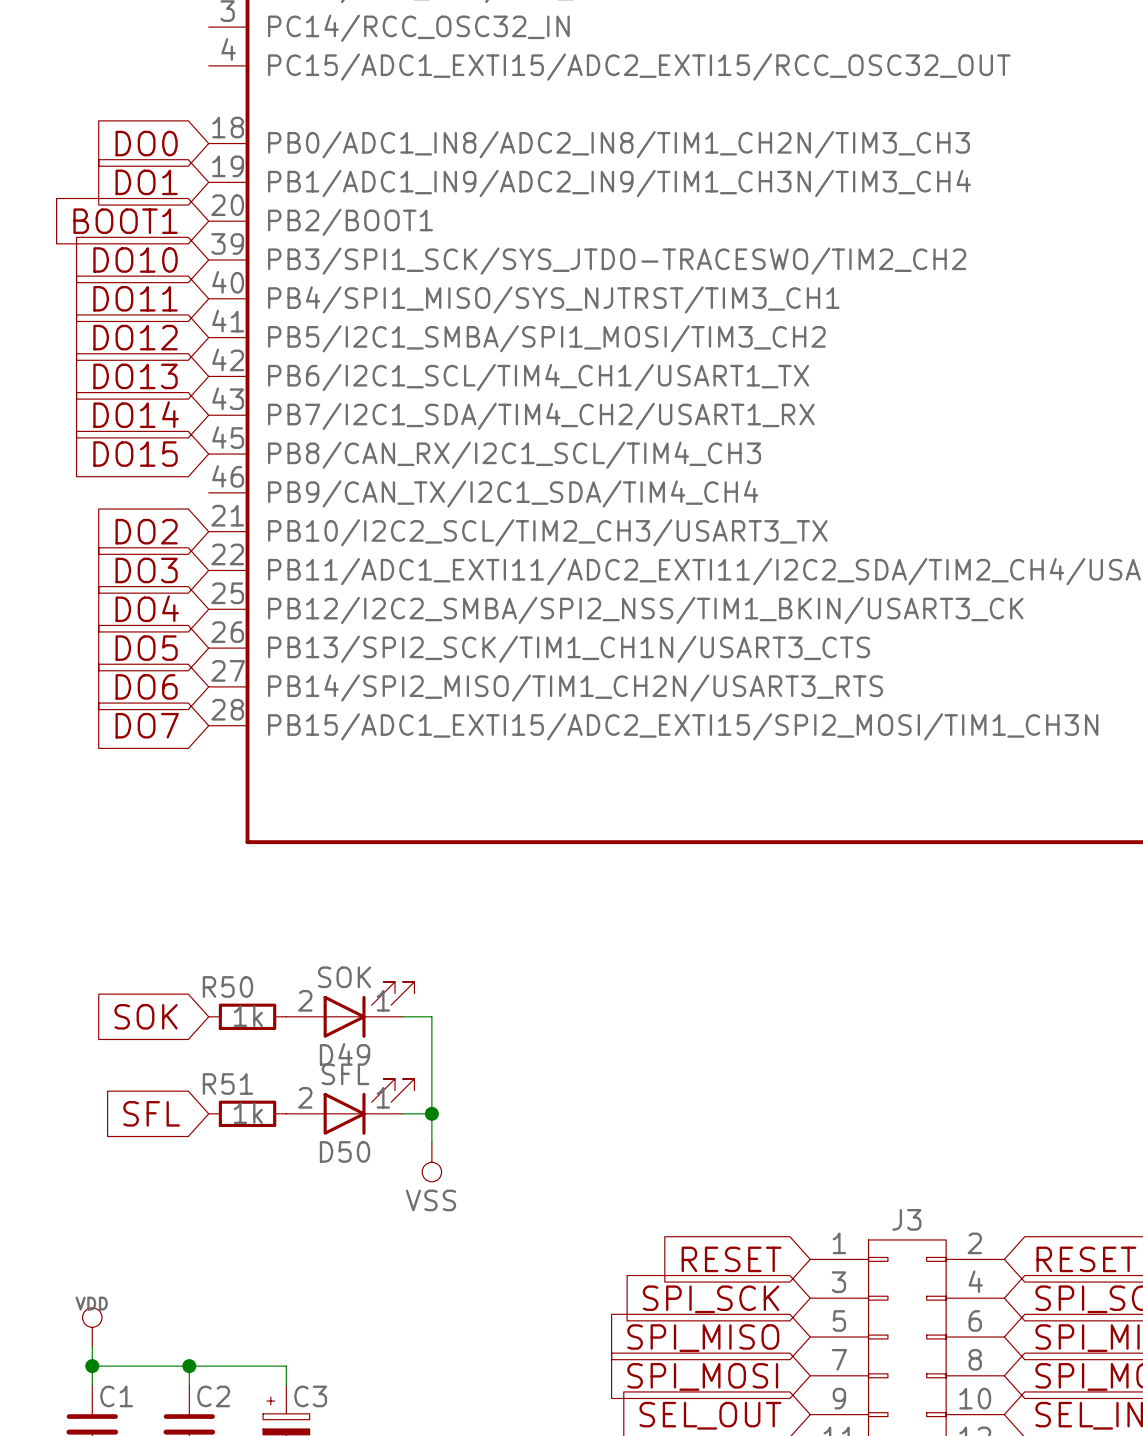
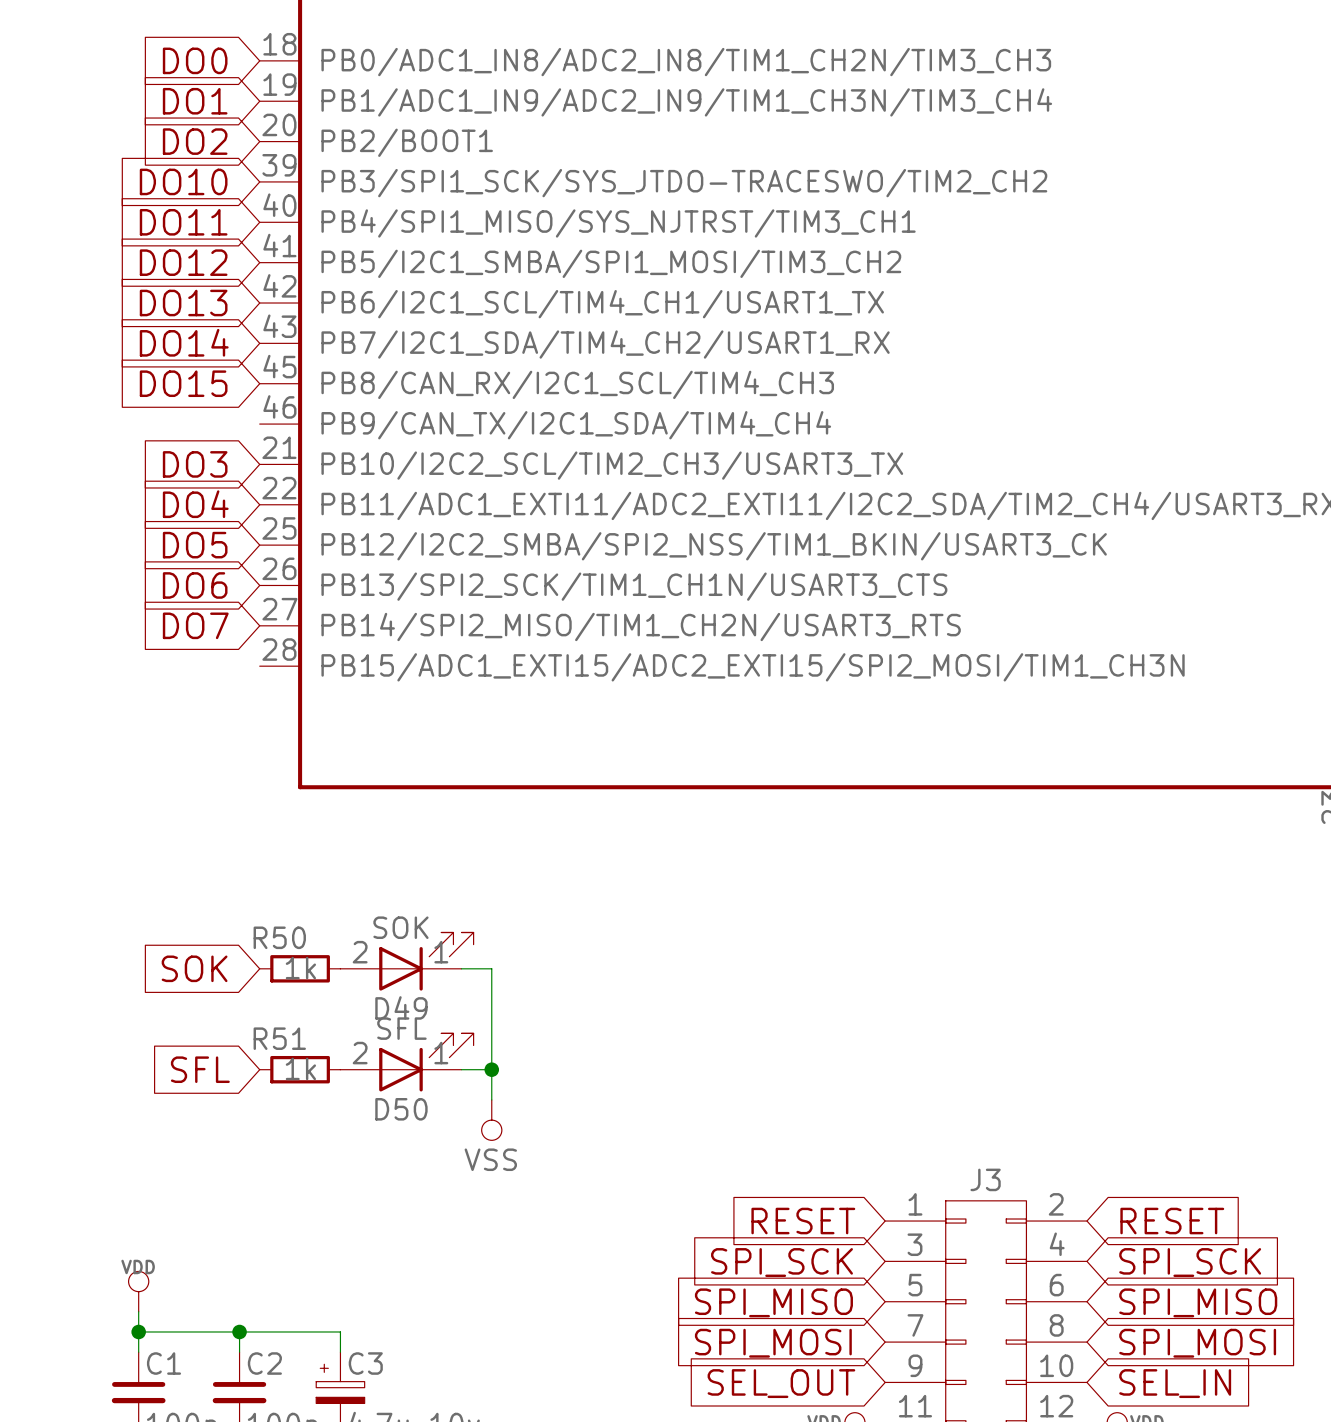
global label: BOOT1 (125, 221) -> DO2 (195, 141)
global label: DO2 (146, 531) -> DO3 (195, 464)
global label: DO3 (146, 570) -> DO4 (195, 504)
global label: DO4 (147, 608) -> DO5 (195, 545)
global label: DO5 (146, 648) -> DO6 (195, 585)
global label: DO6 (146, 686) -> DO7 (195, 625)
global label: DO7 (147, 725) -> none

